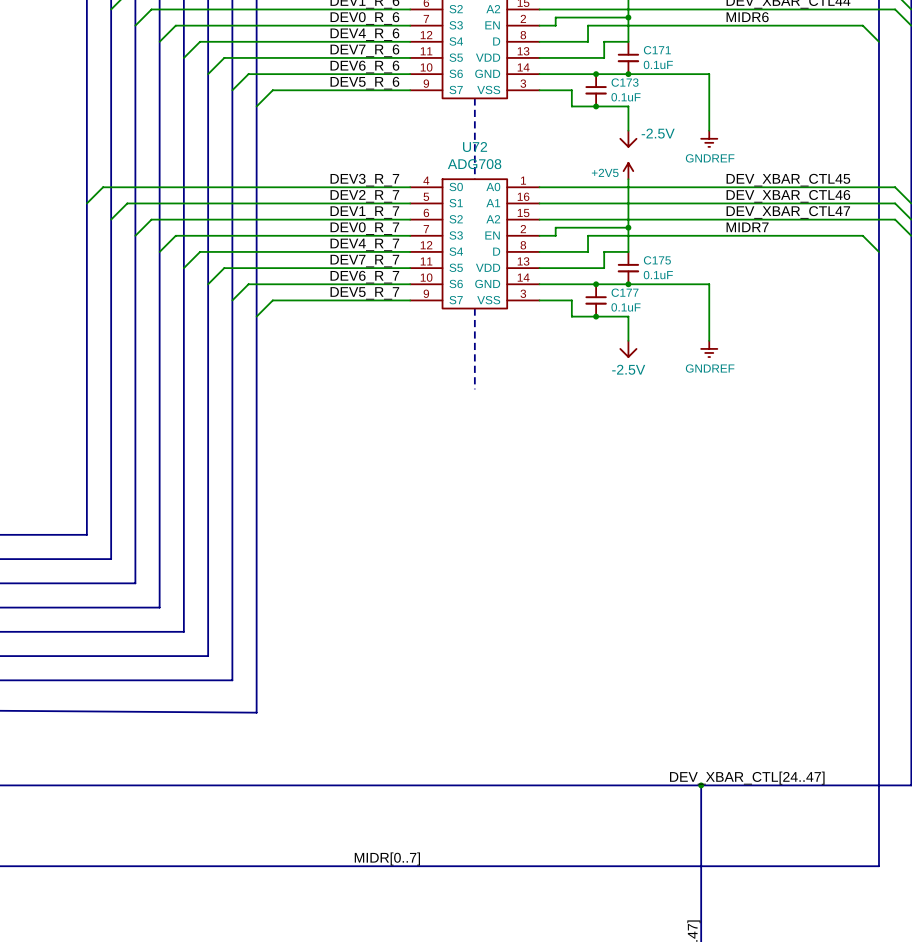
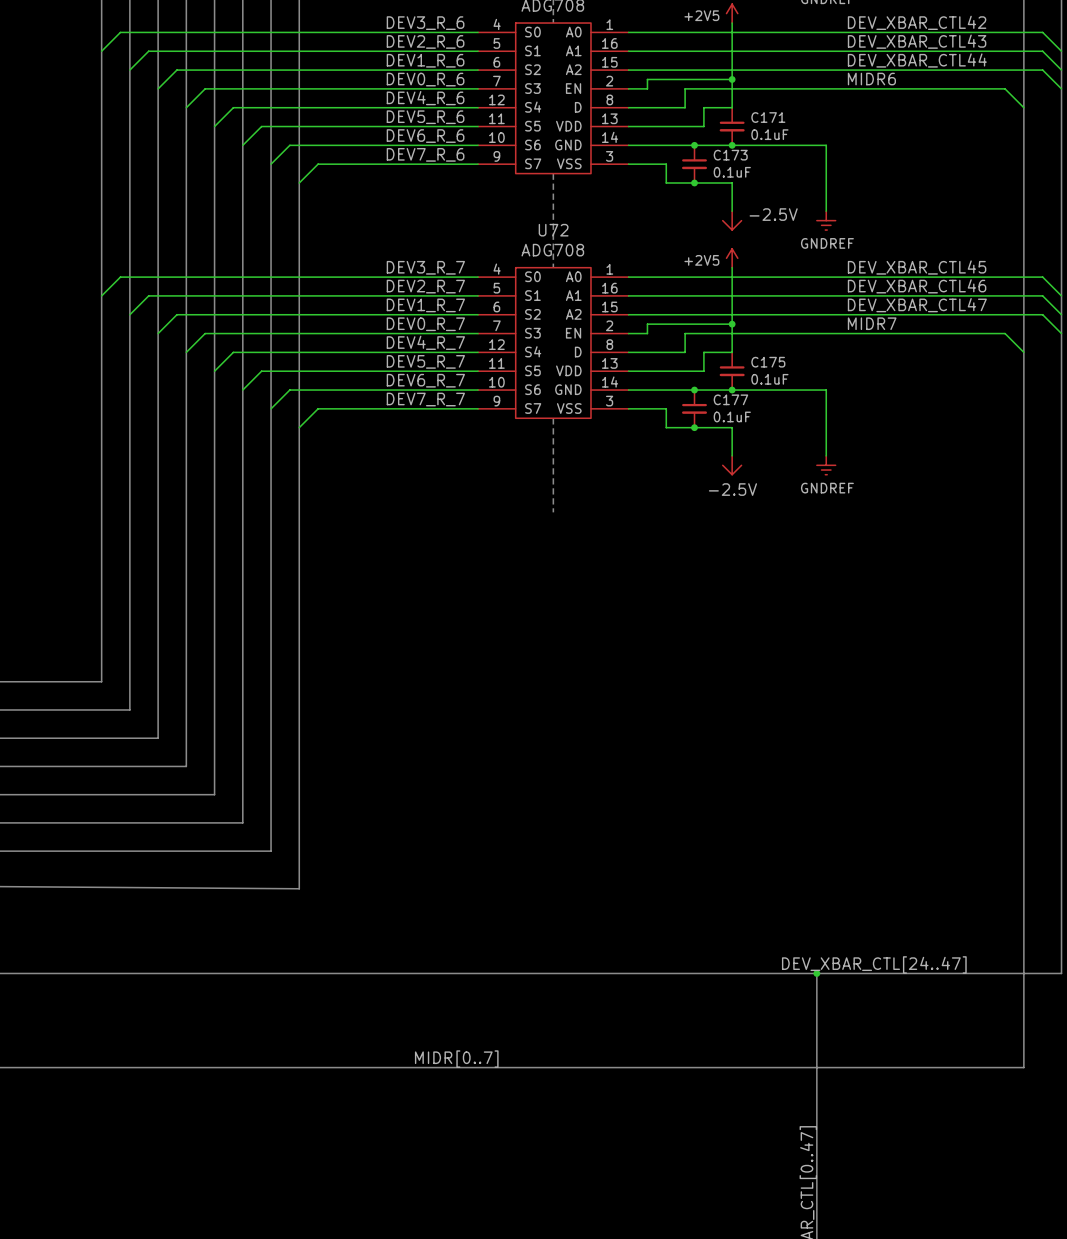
label: DEV7_R_6 (364, 50) -> DEV5_R_6 (425, 117)
label: DEV5_R_6 (364, 83) -> DEV7_R_6 (425, 154)
label: DEV7_R_7 (364, 261) -> DEV5_R_7 (425, 361)
label: DEV5_R_7 (364, 293) -> DEV7_R_7 (425, 399)

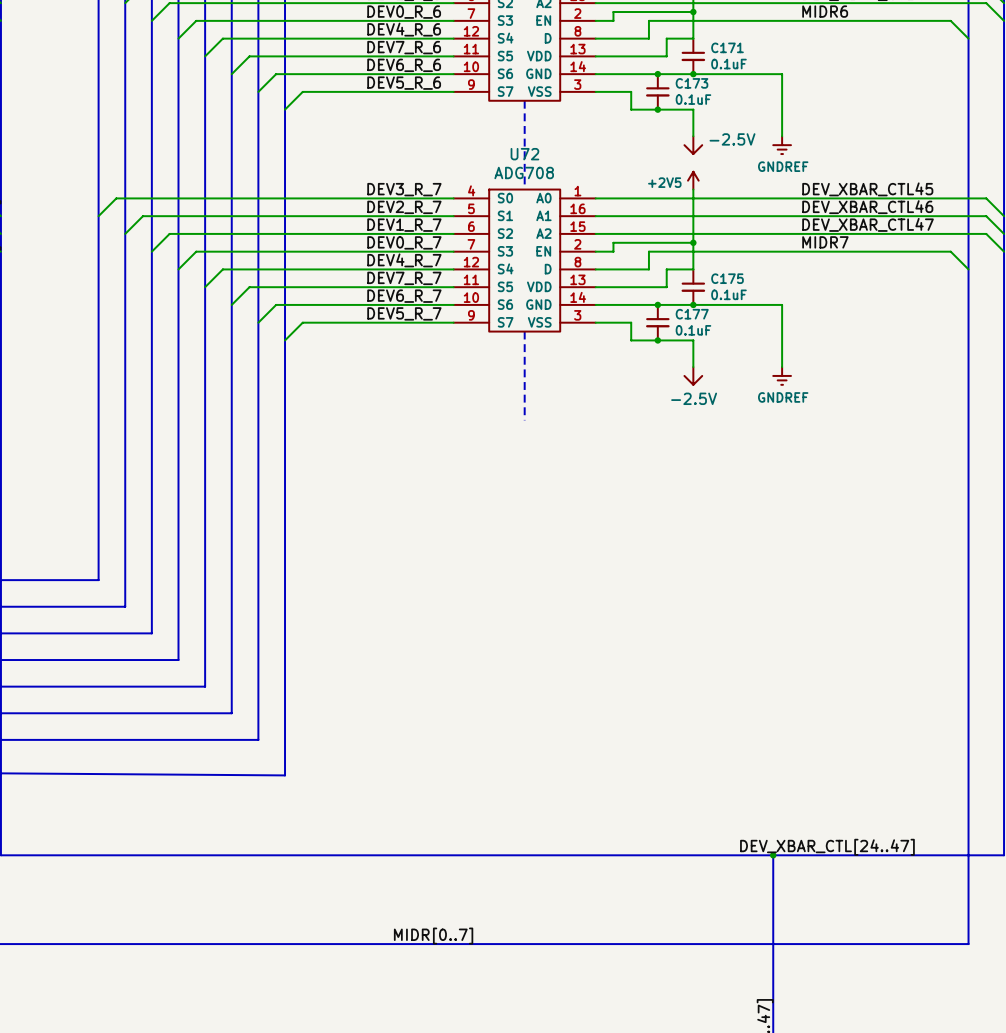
label: DEV5_R_6 (425, 117) -> DEV7_R_6 (404, 47)
label: DEV7_R_6 (425, 154) -> DEV5_R_6 (404, 83)
label: DEV5_R_7 (425, 361) -> DEV7_R_7 (404, 278)
label: DEV7_R_7 (425, 399) -> DEV5_R_7 (404, 313)

